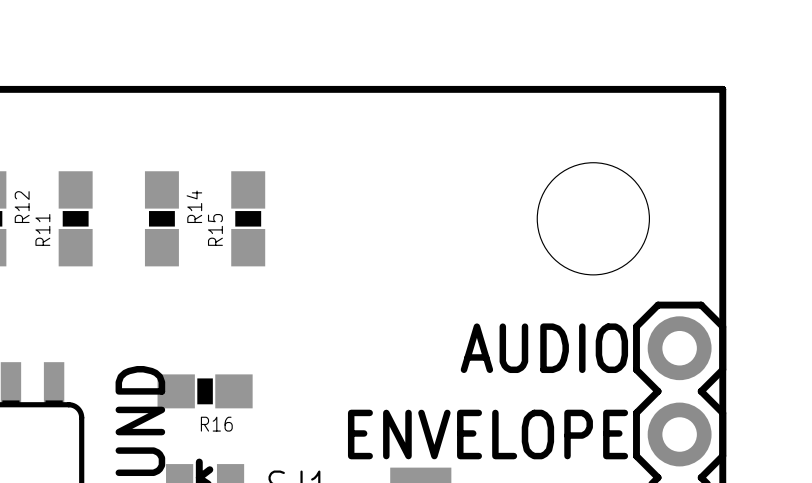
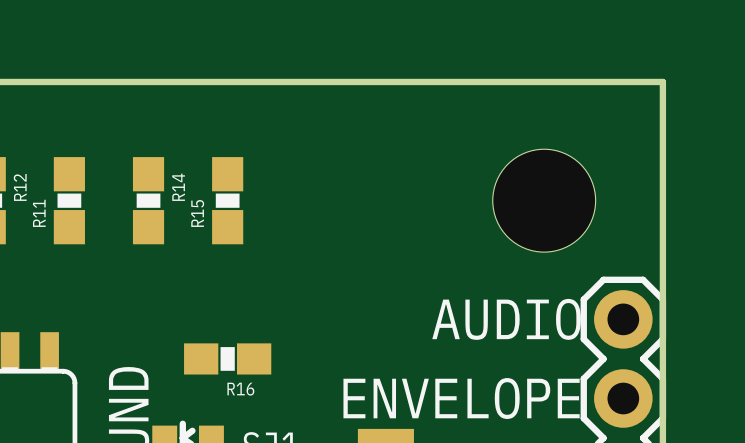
R16 position: (205, 391) -> (227, 358)

